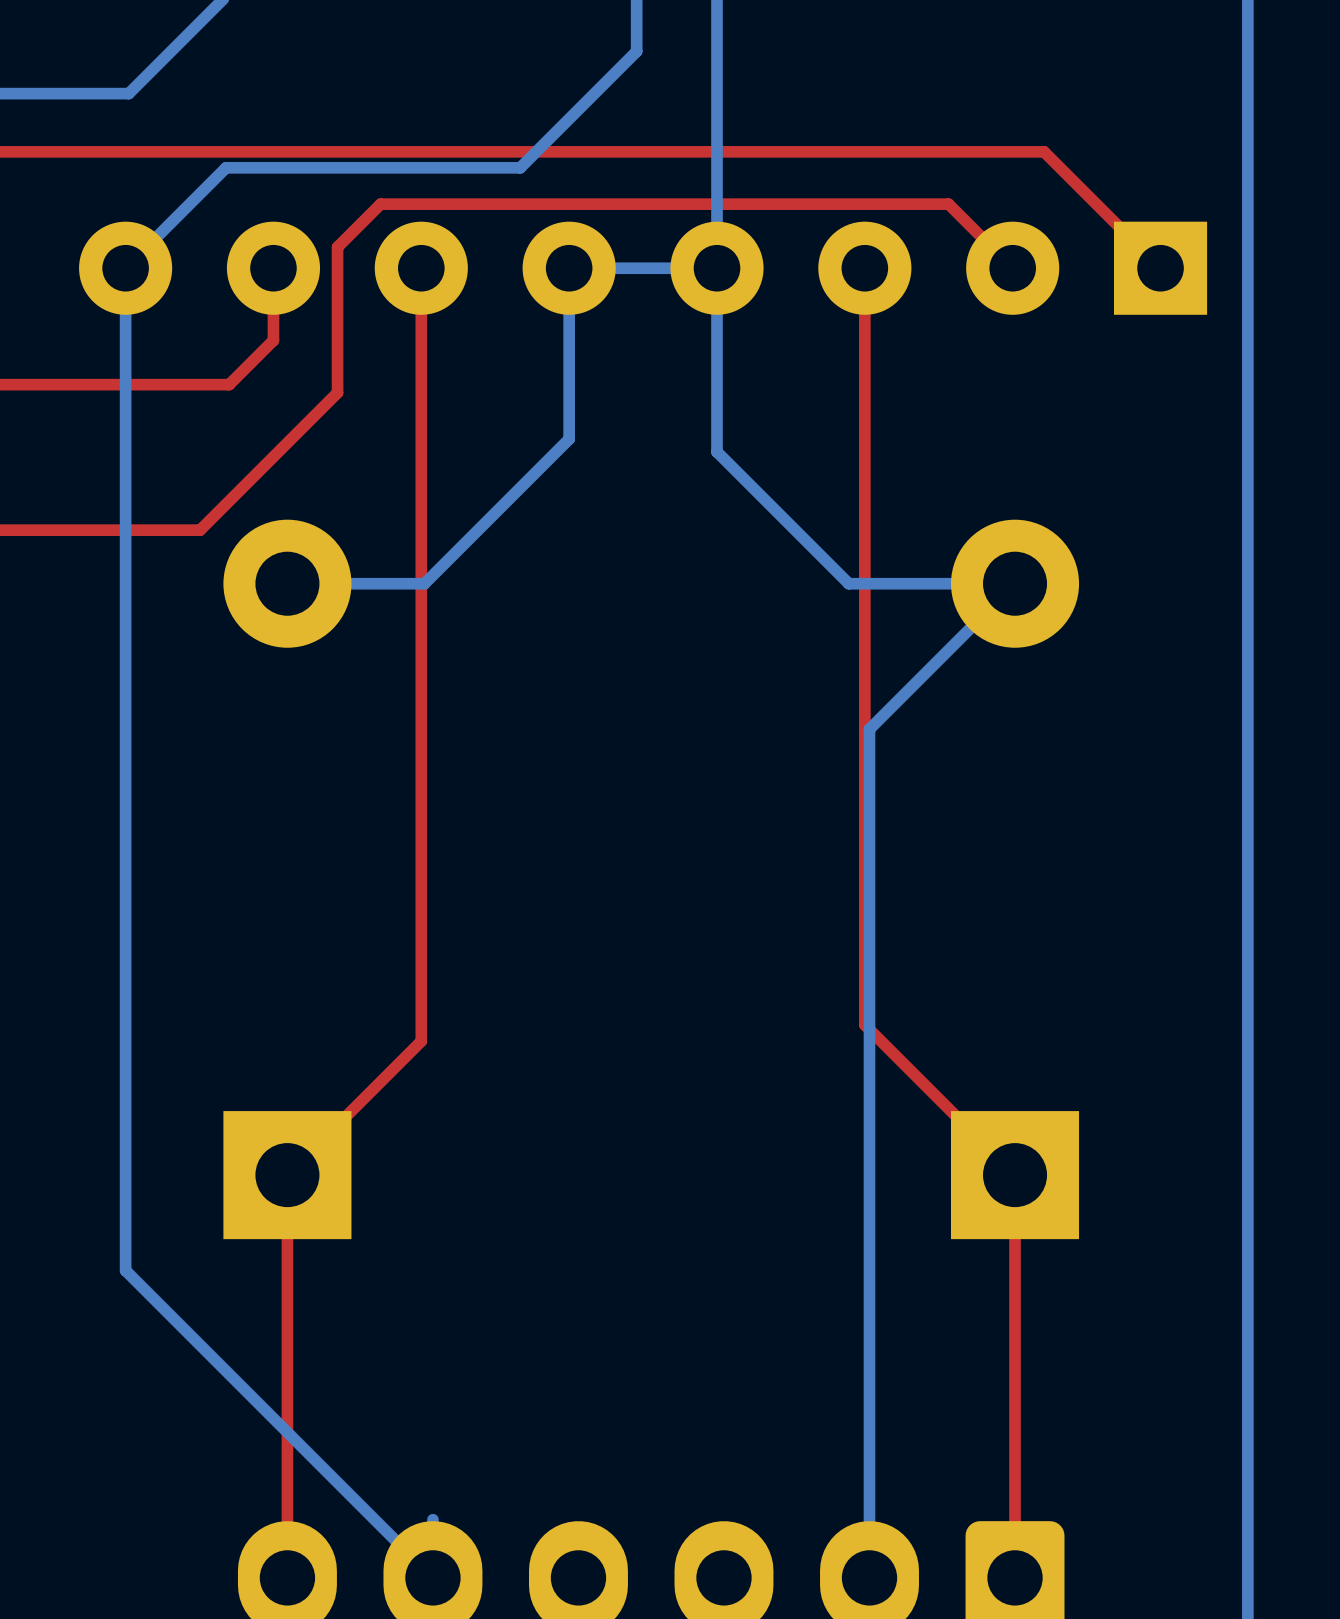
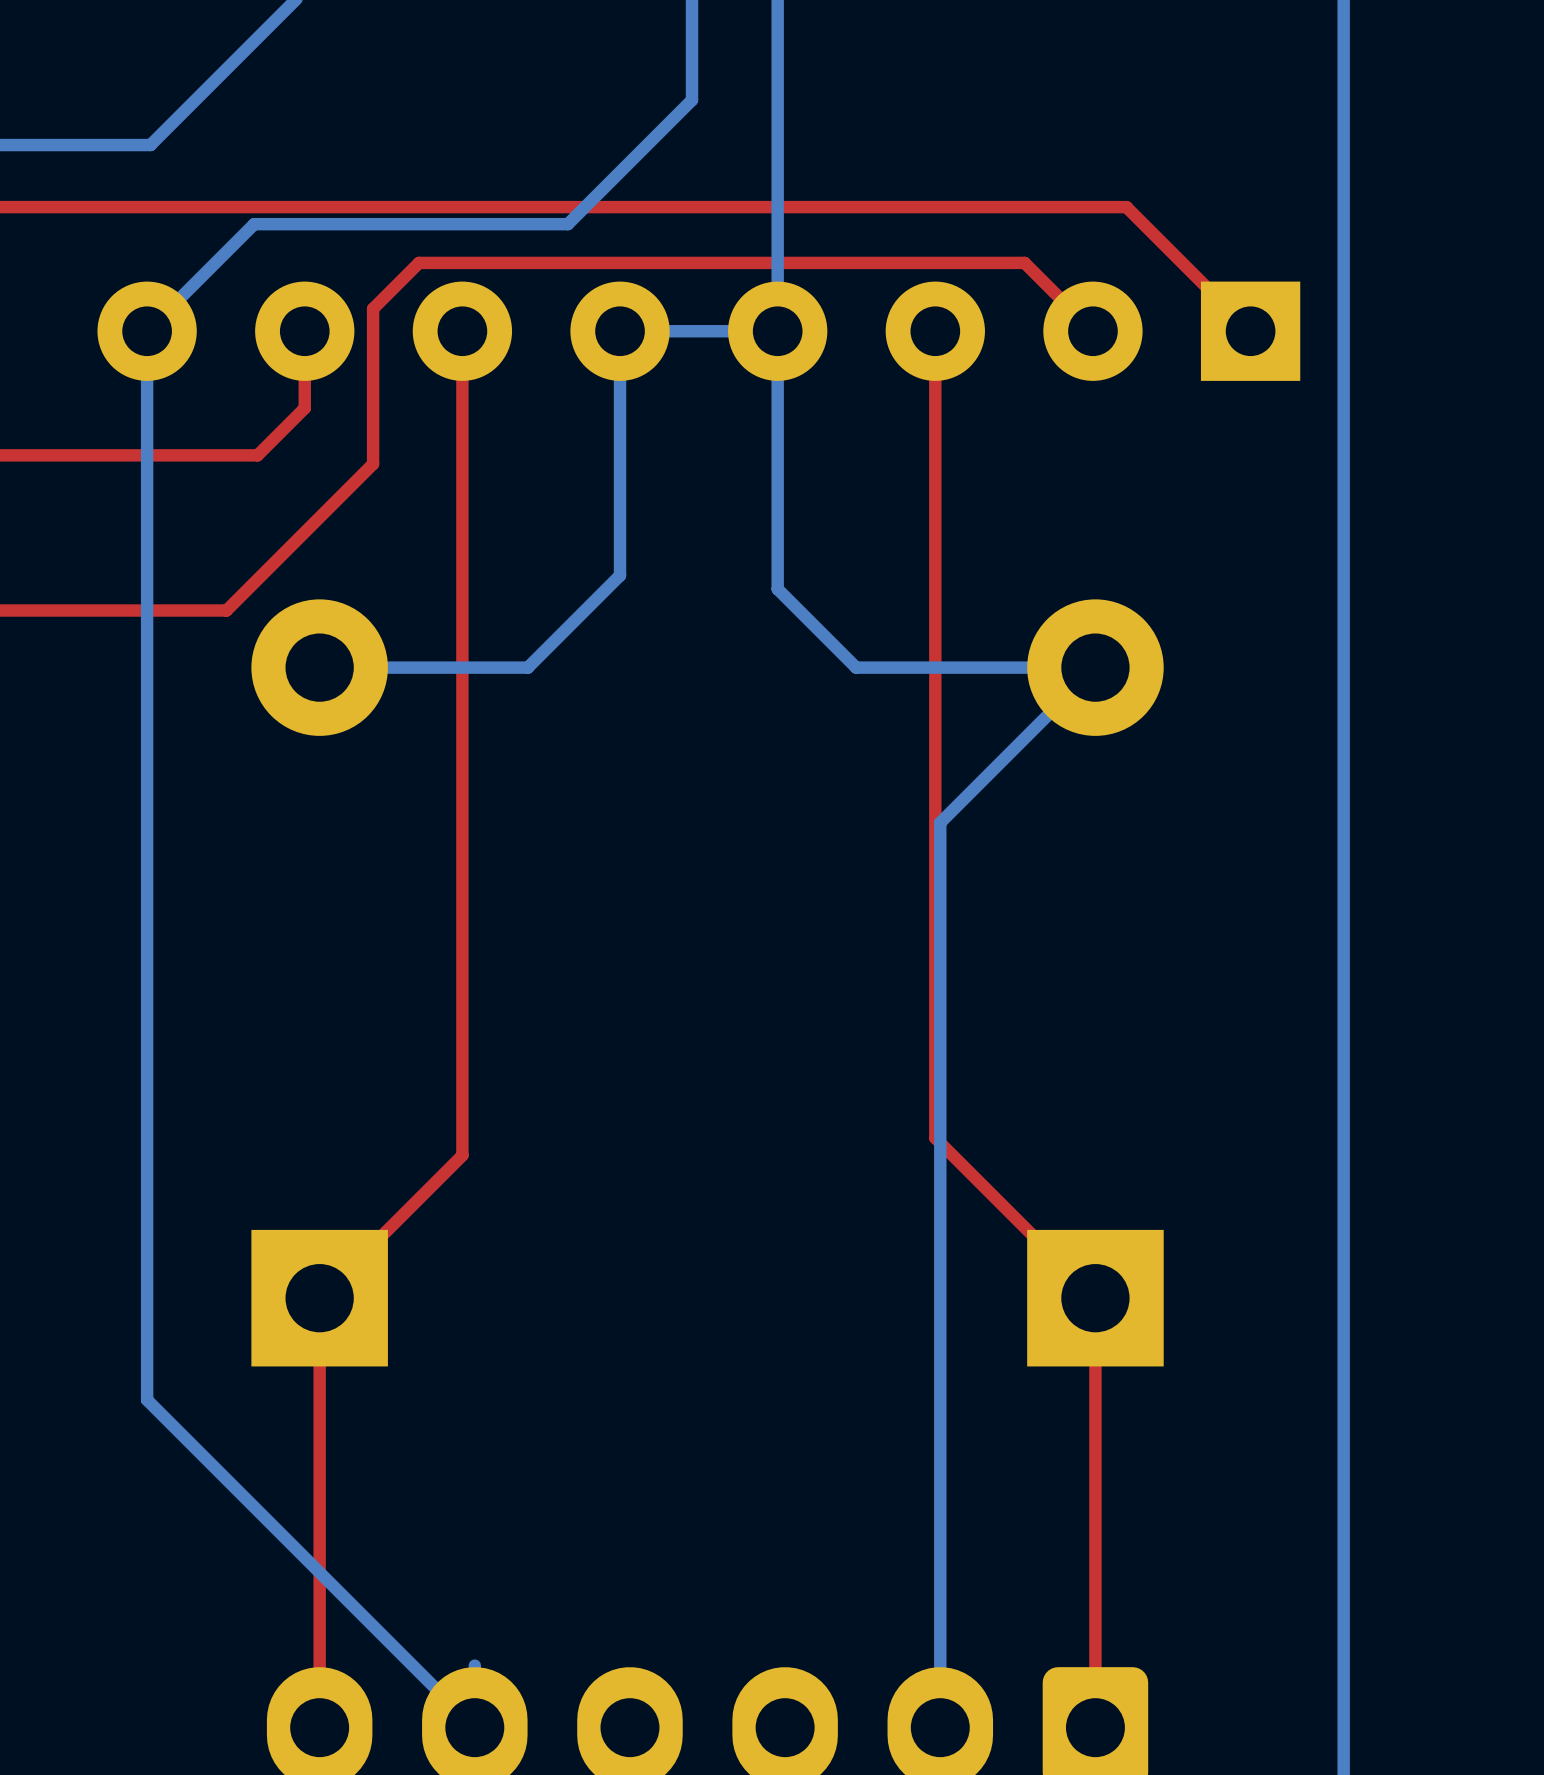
bottom track: (569, 439) (424, 583) -> (620, 513) (620, 575) (527, 667) (465, 667)
bottom track: (717, 451) (848, 583) -> (777, 527) (777, 589) (856, 667) (918, 667)

